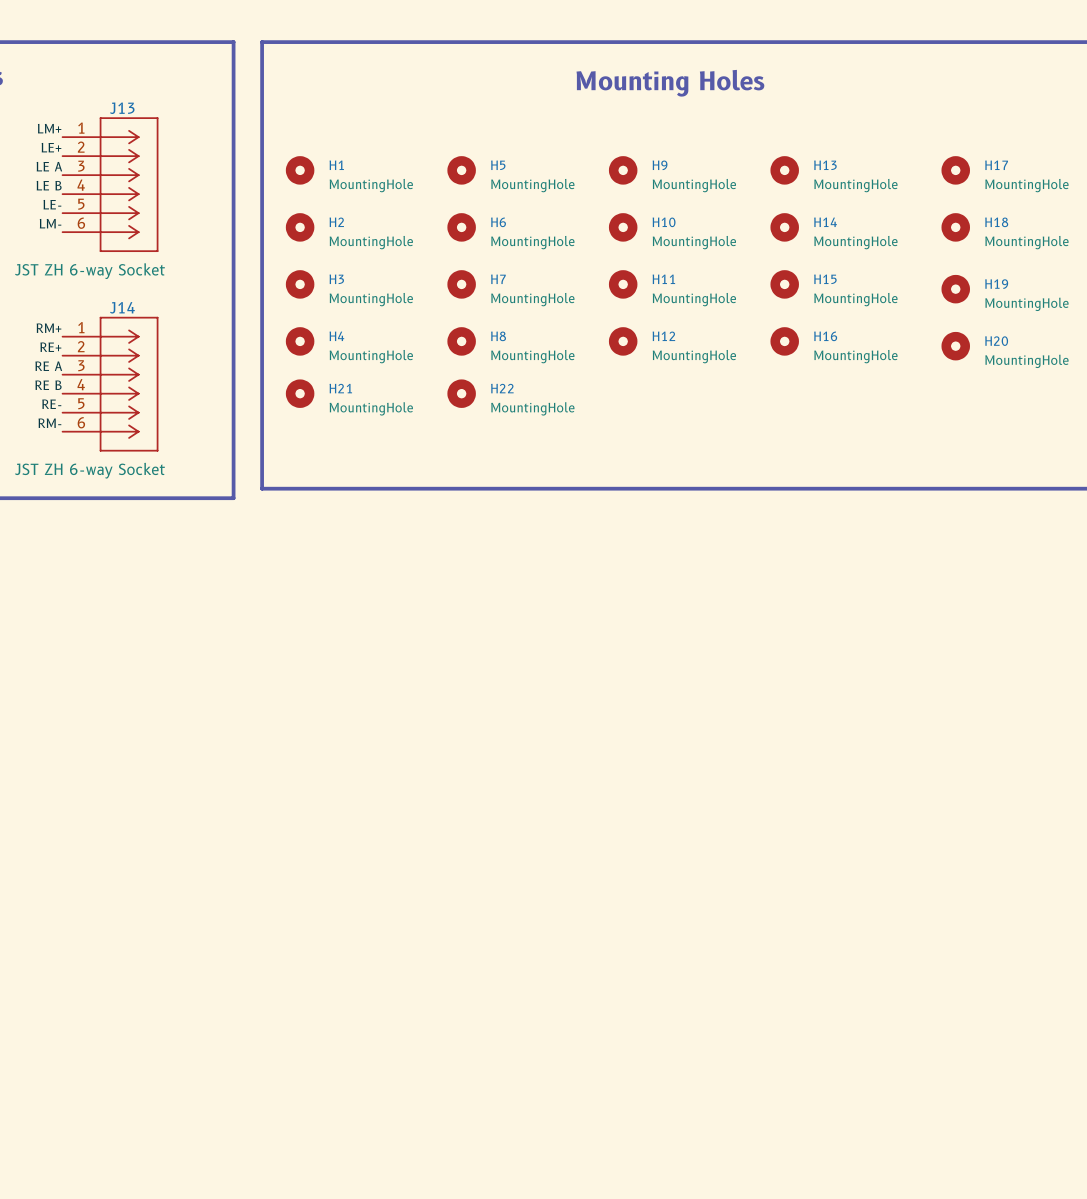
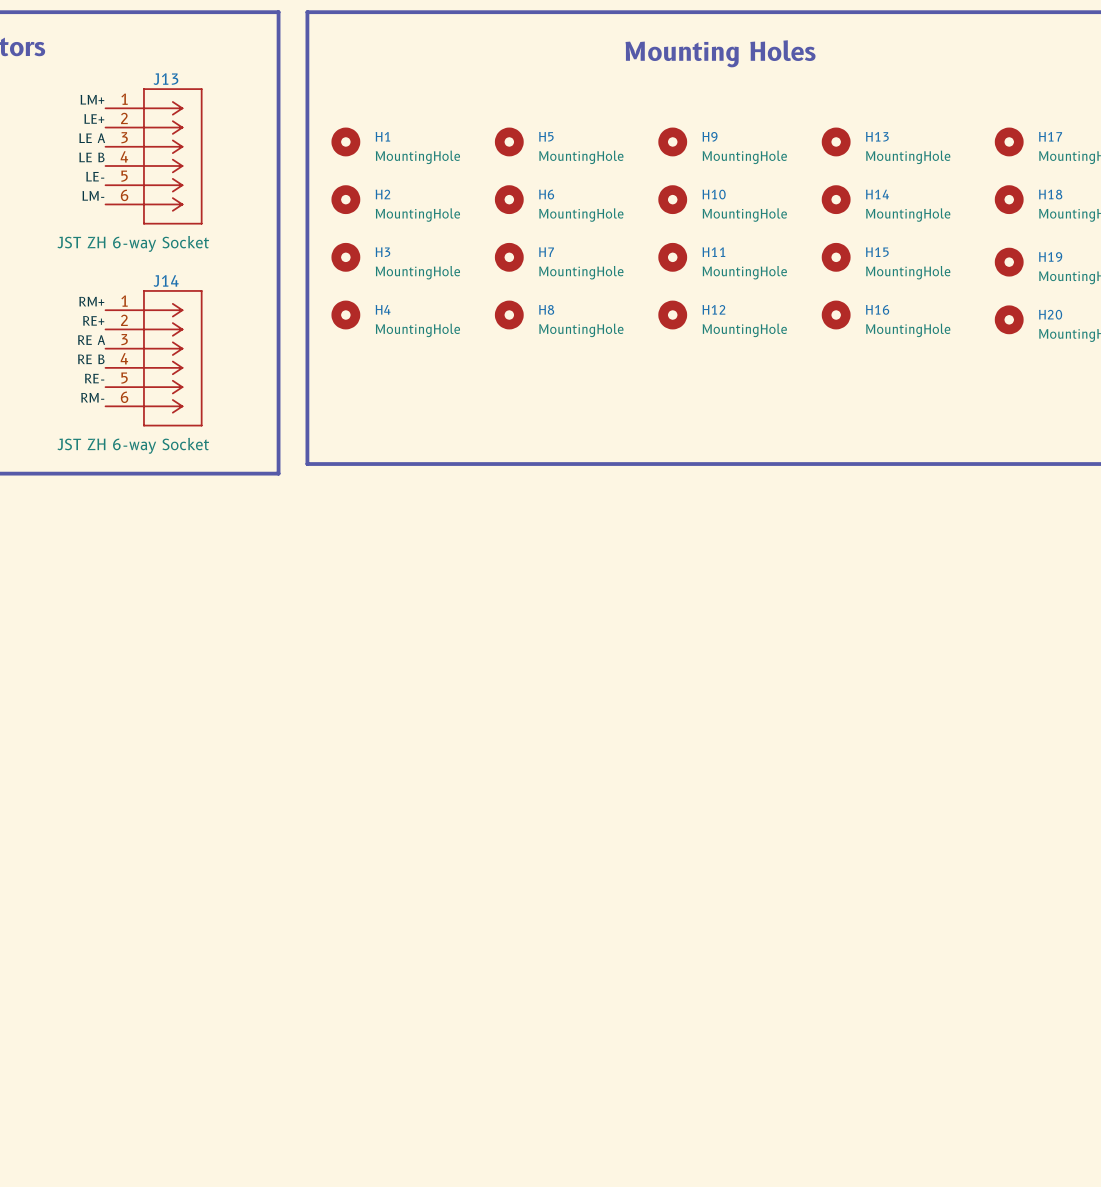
H21: MountingHole (300, 393) -> none
H22: MountingHole (461, 393) -> none

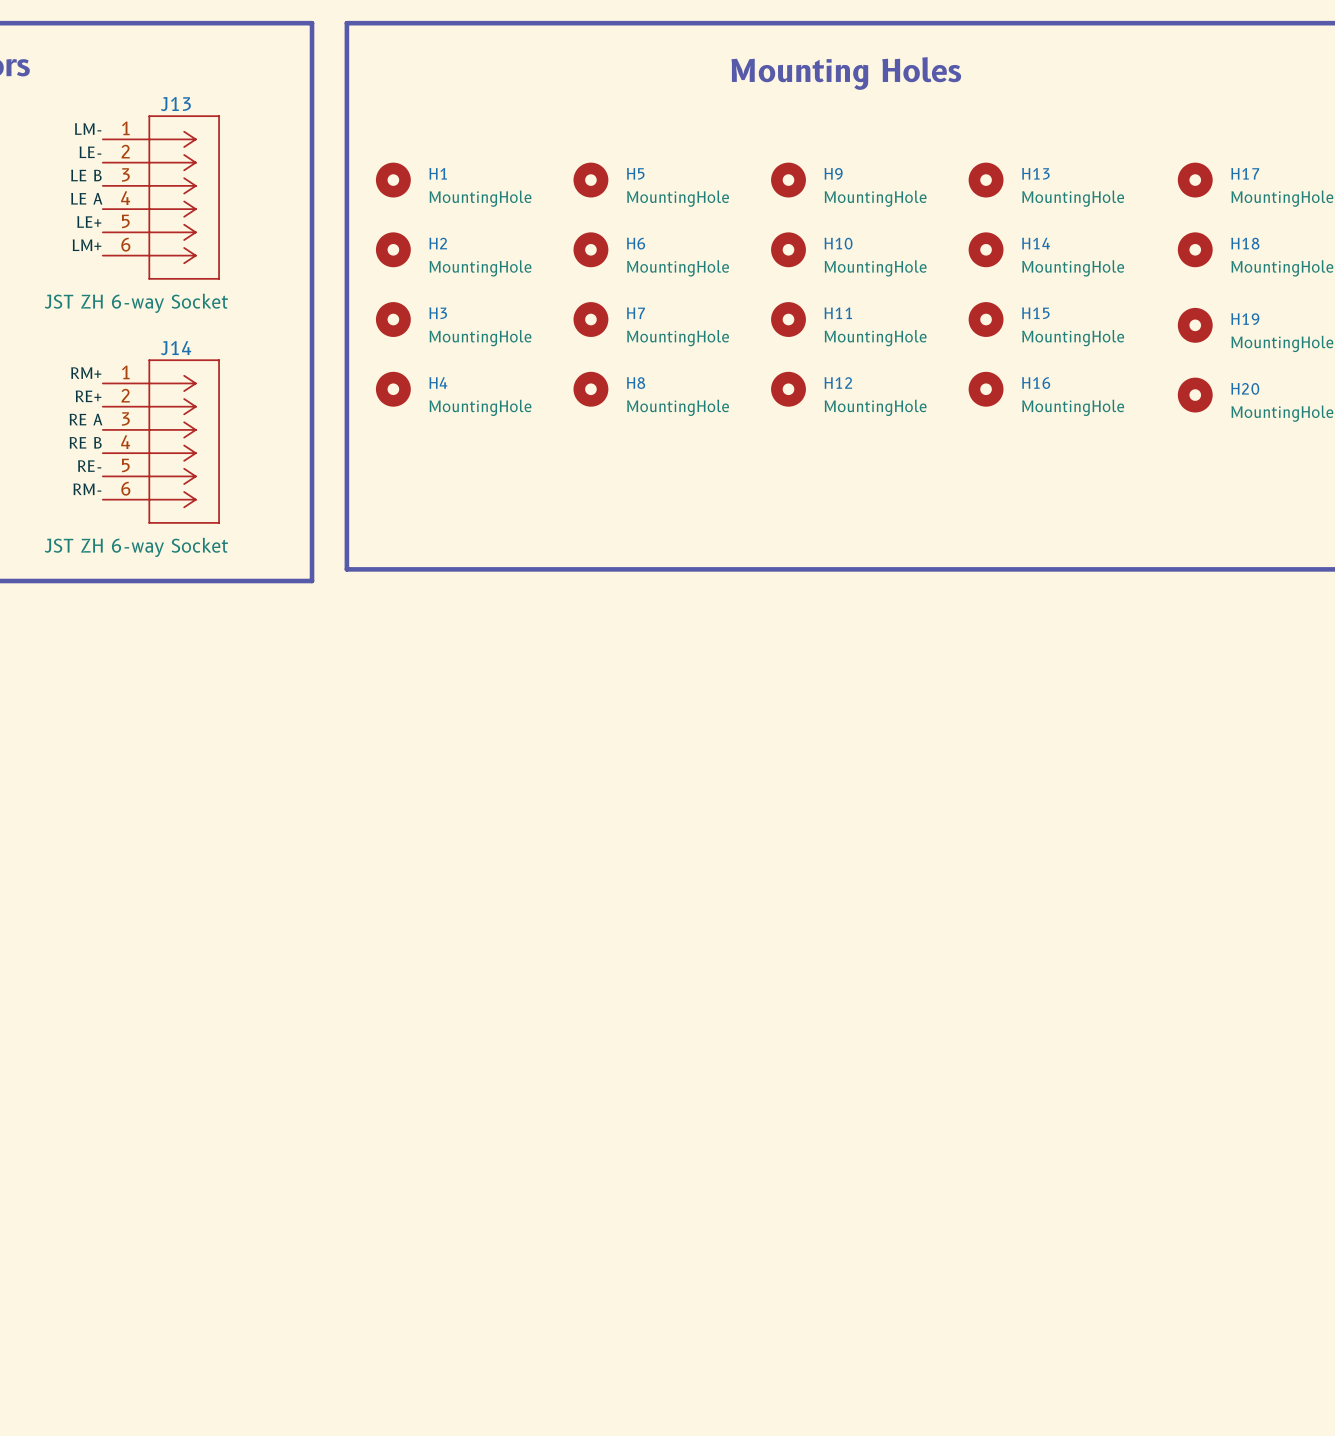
label: LM+ (92, 99) -> LM- (88, 129)
label: LE+ (94, 118) -> LE- (90, 152)
label: LE A (92, 138) -> LE B (86, 175)
label: LE B (91, 157) -> LE A (86, 198)
label: LE- (95, 176) -> LE+ (89, 221)
label: LM- (93, 195) -> LM+ (87, 245)

